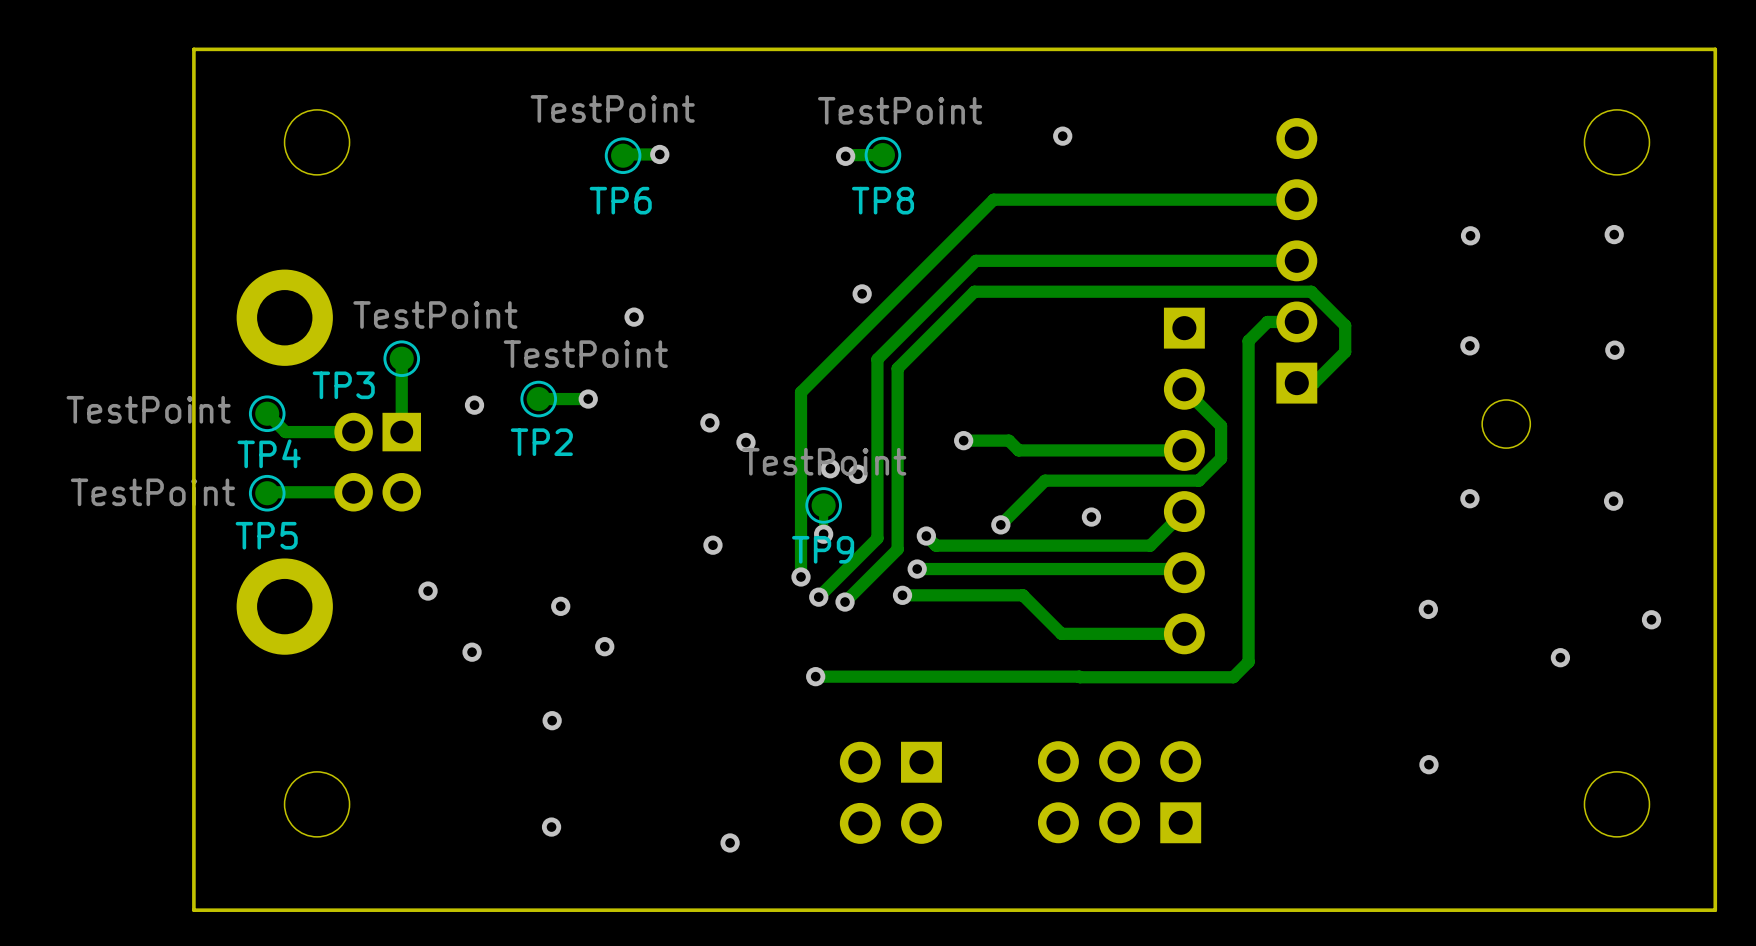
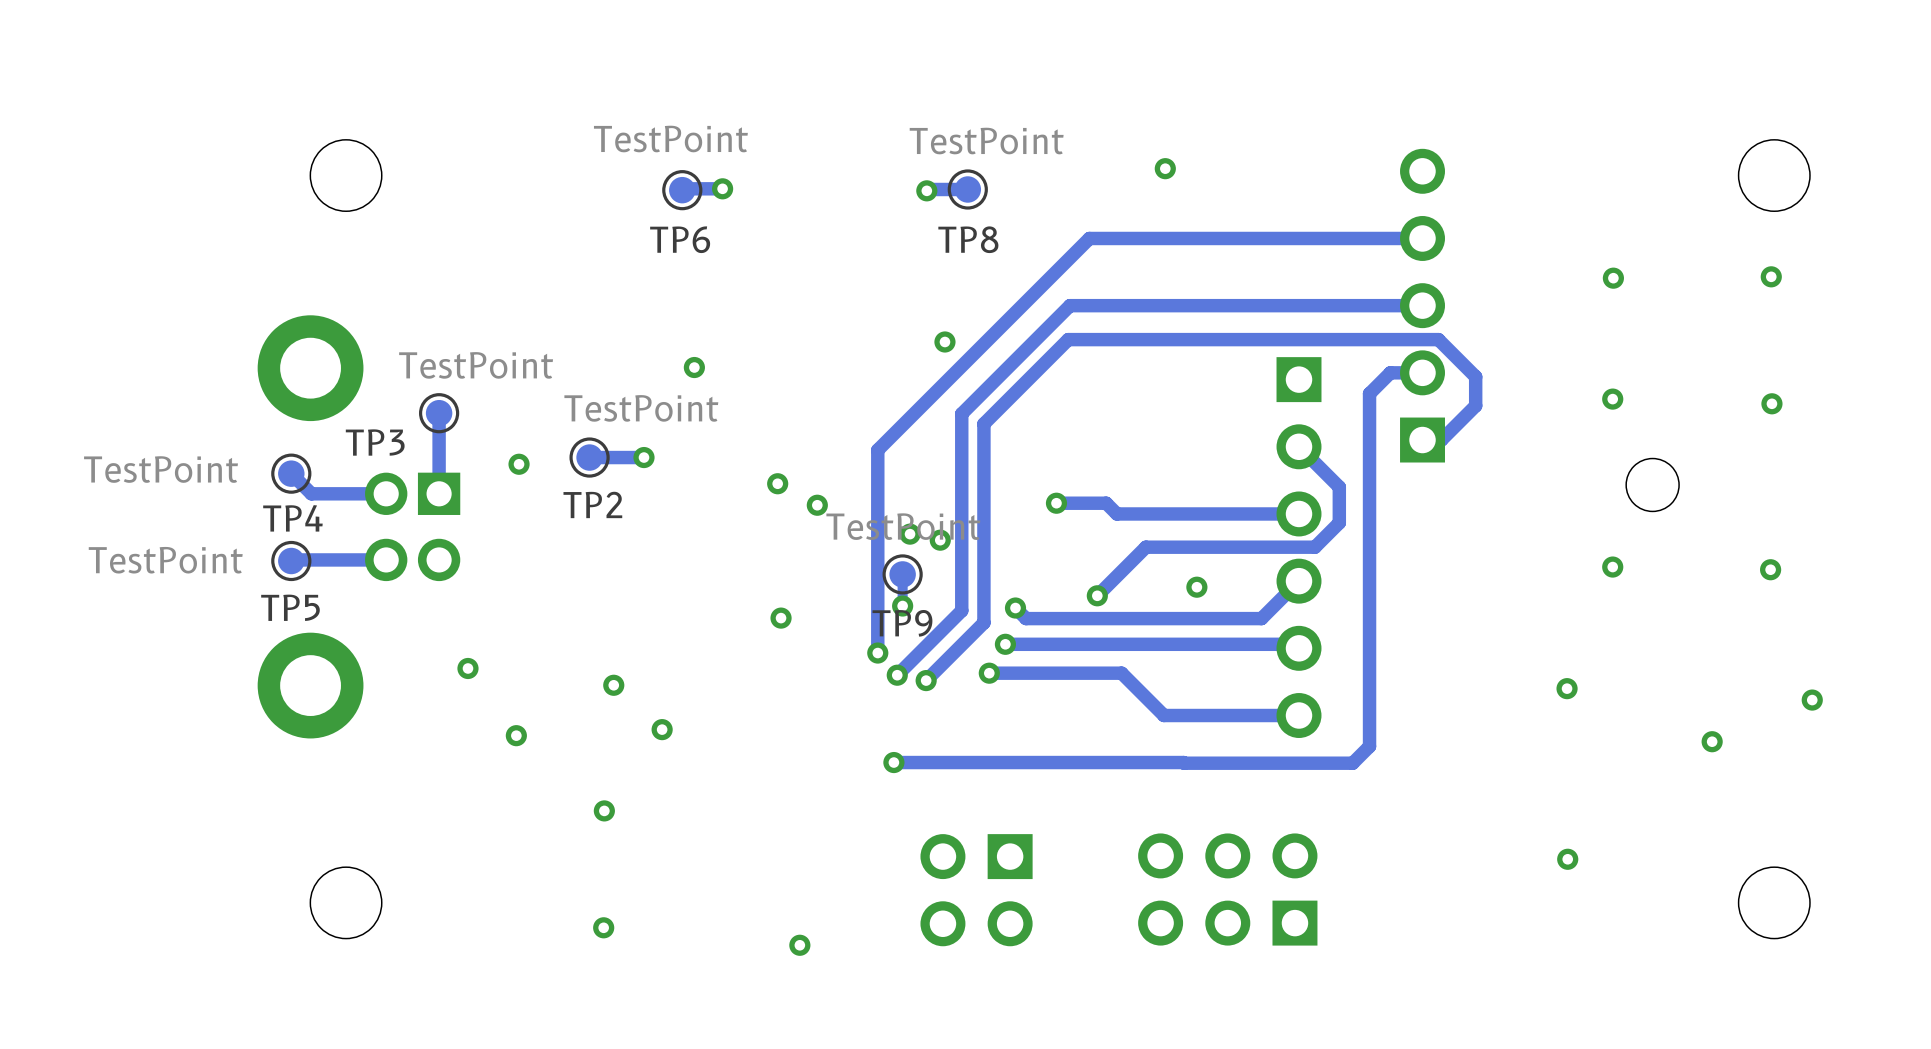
board edge: (1715, 49) (193, 49) (193, 910) (1715, 910) (1715, 49) -> none

